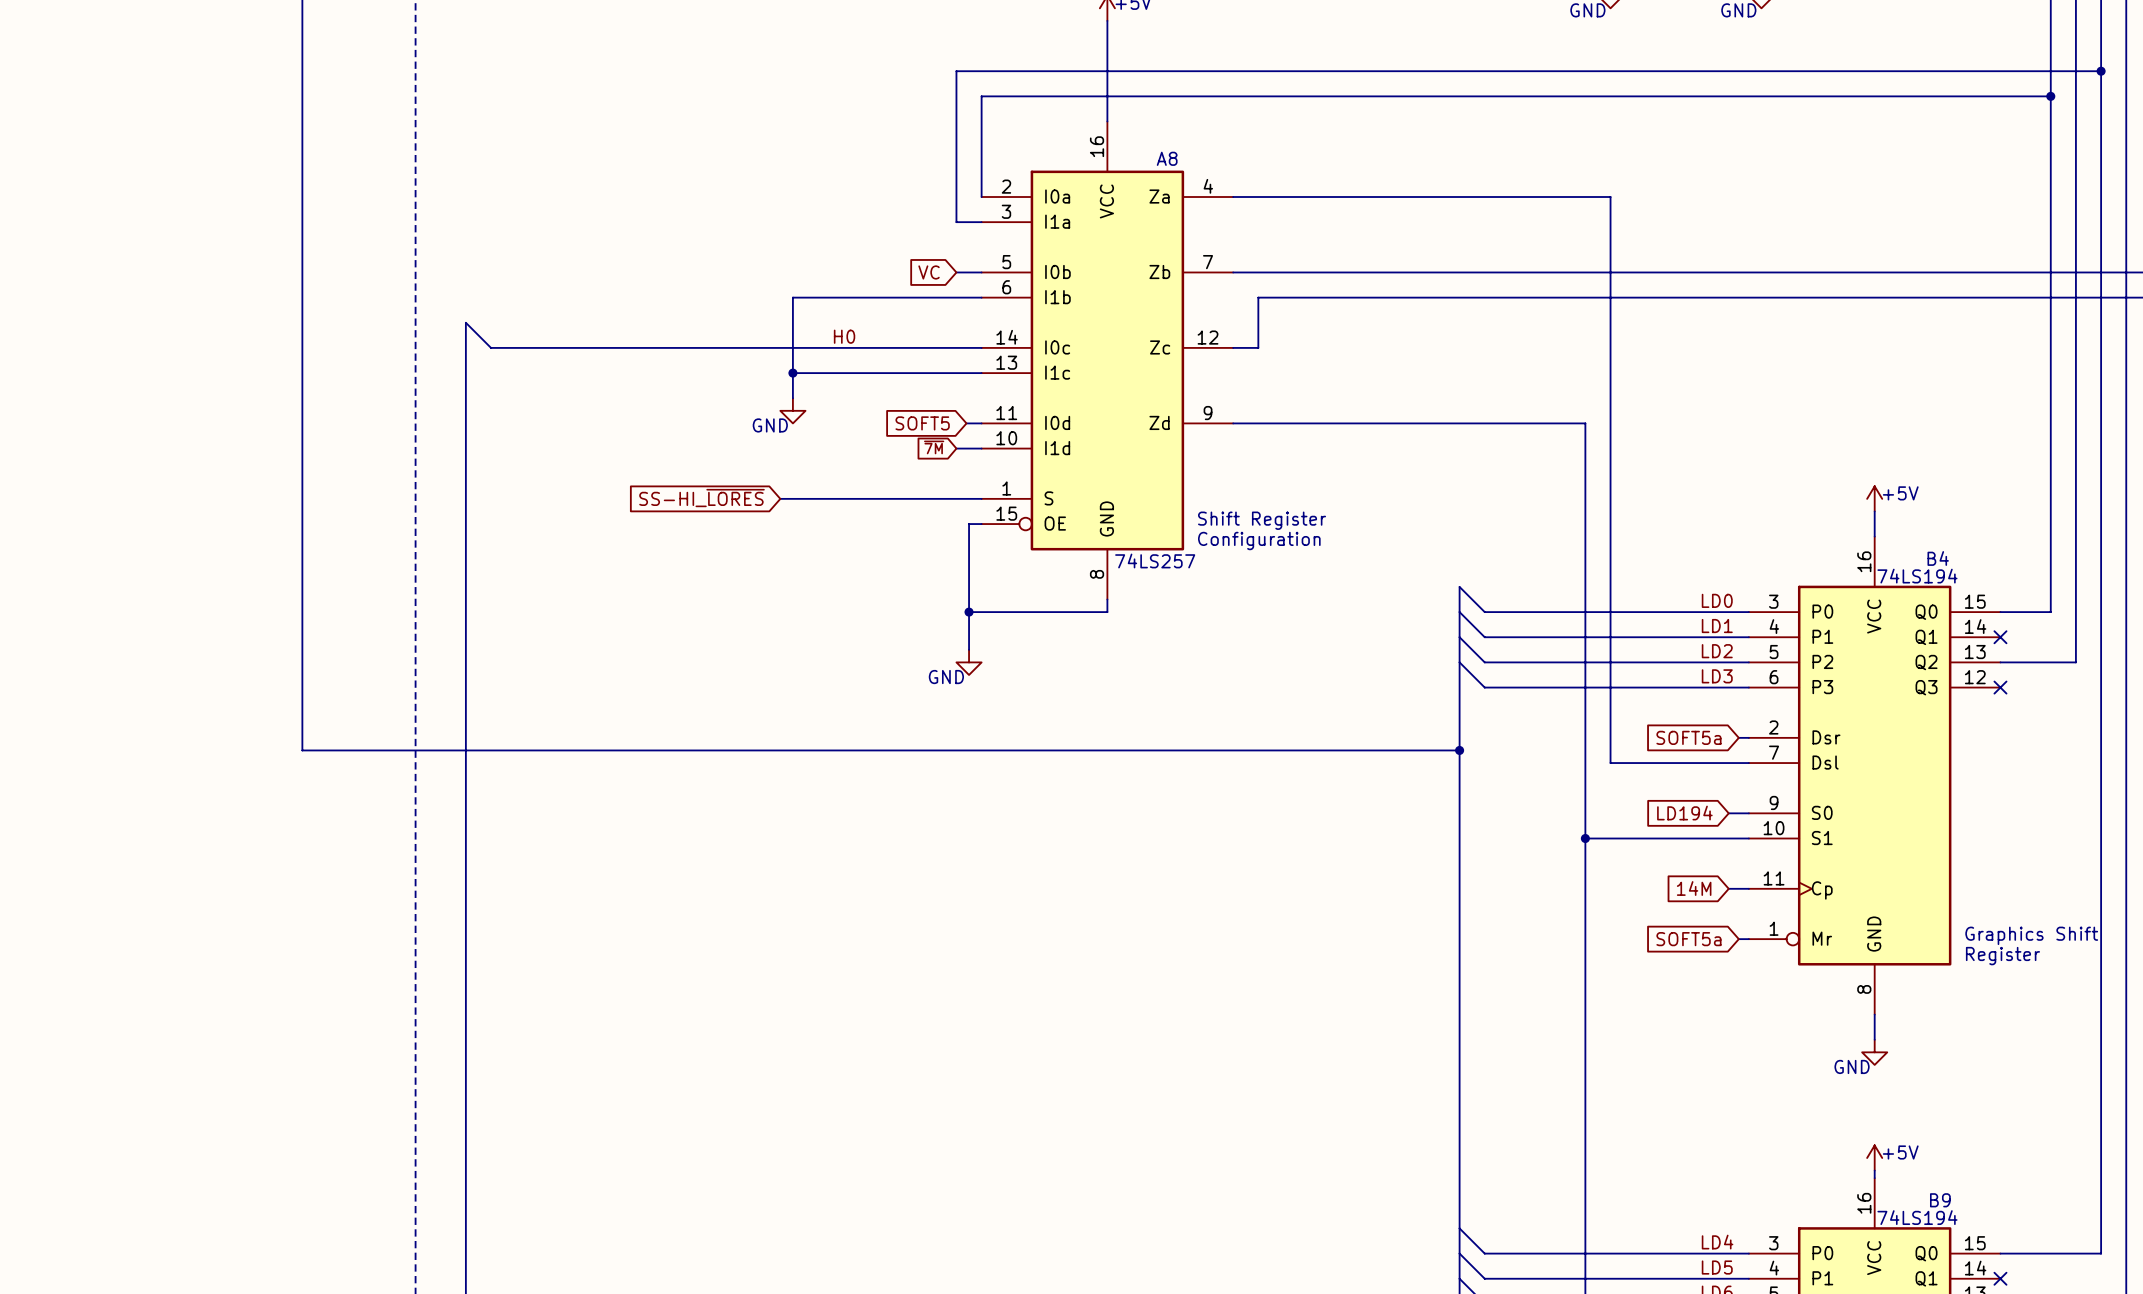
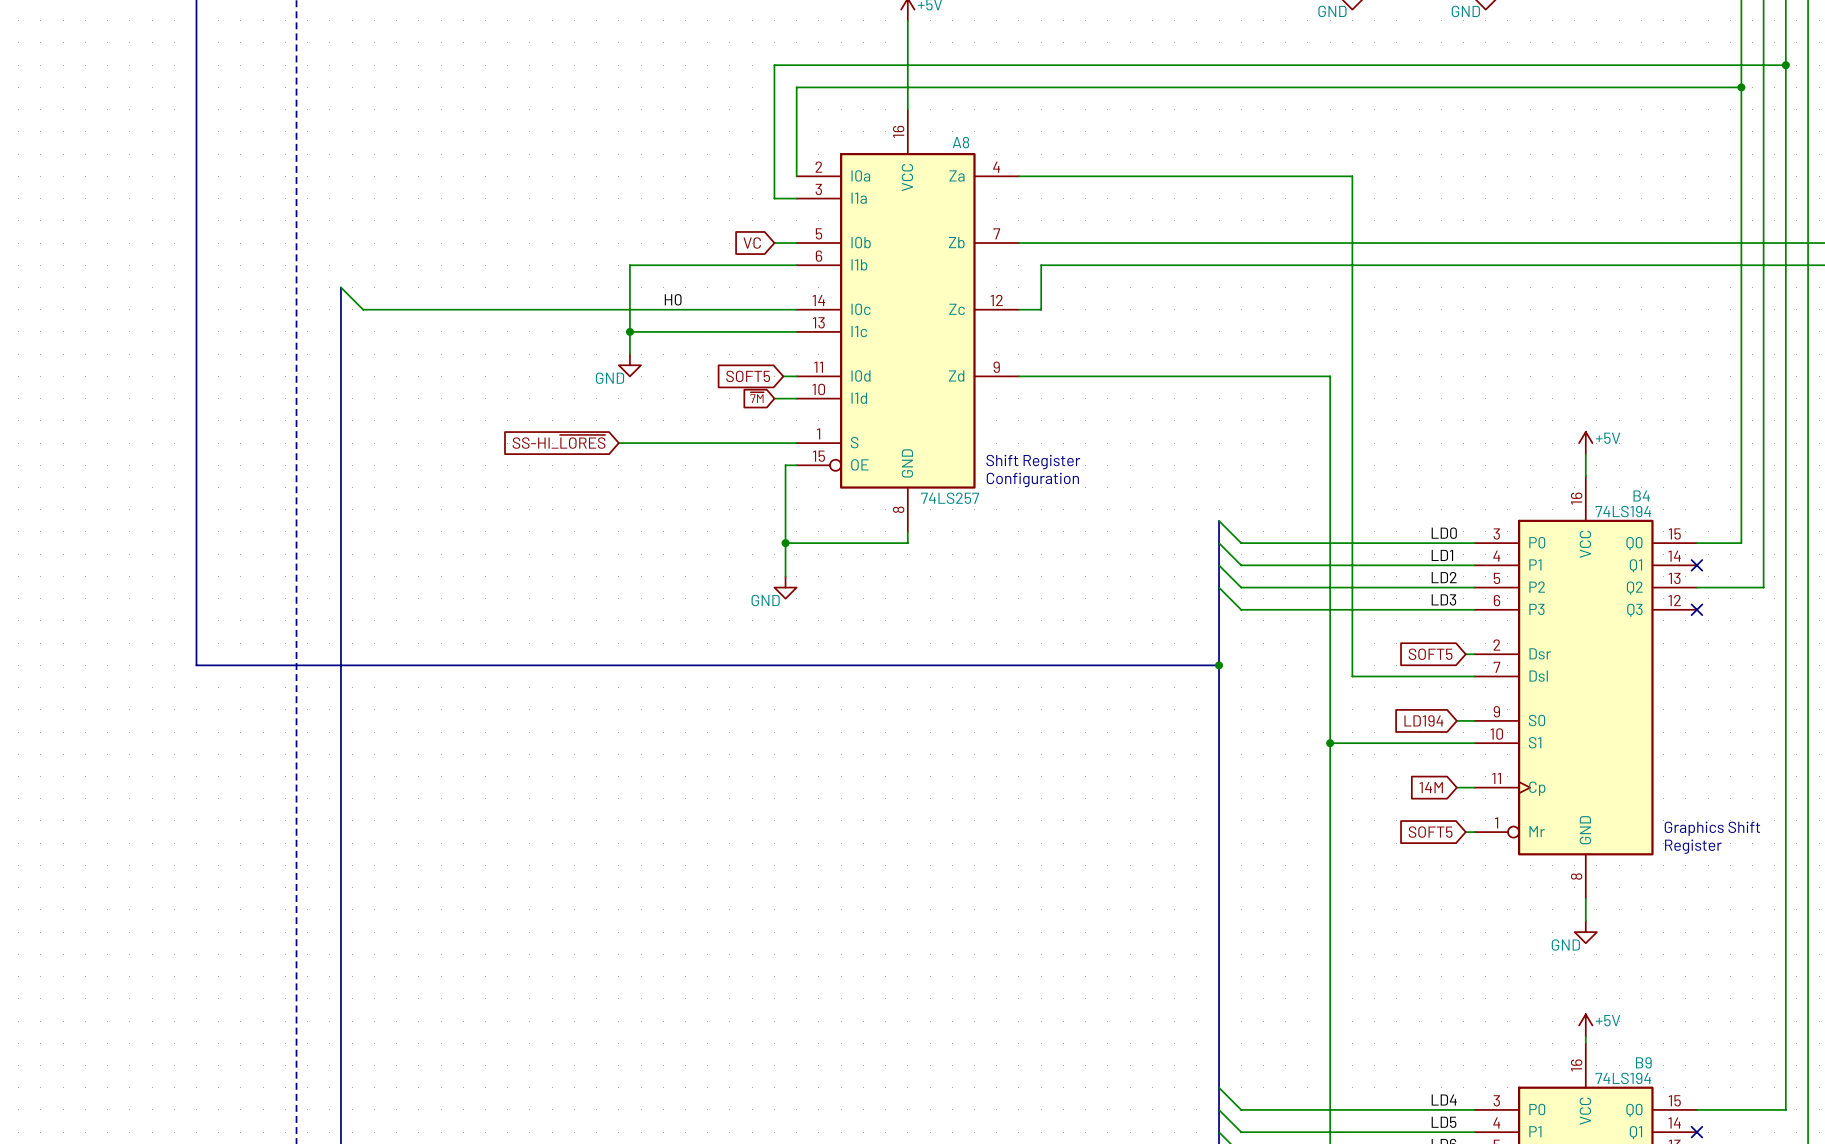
global label: SOFT5a (1688, 737) -> SOFT5 (1430, 654)
global label: SOFT5a (1688, 939) -> SOFT5 (1430, 832)

